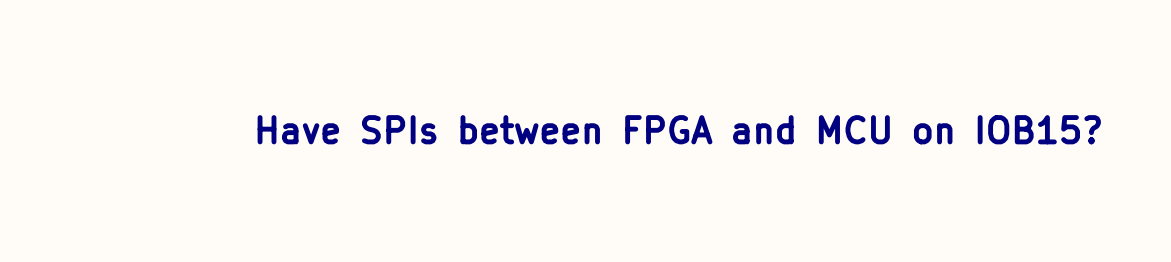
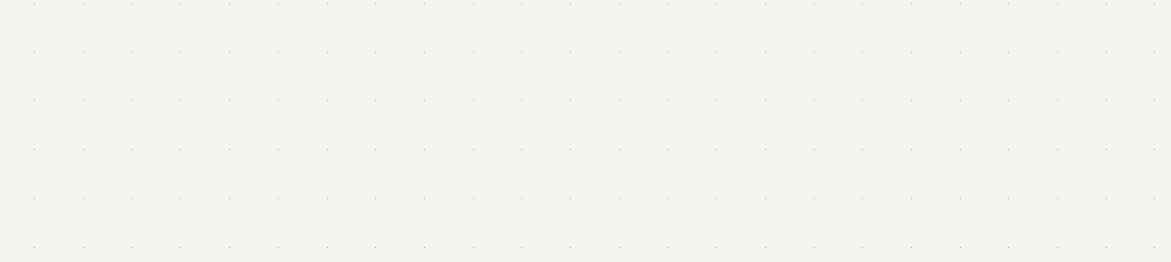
text: Have SPIs between FPGA and MCU on IOB15? (679, 129) -> none

